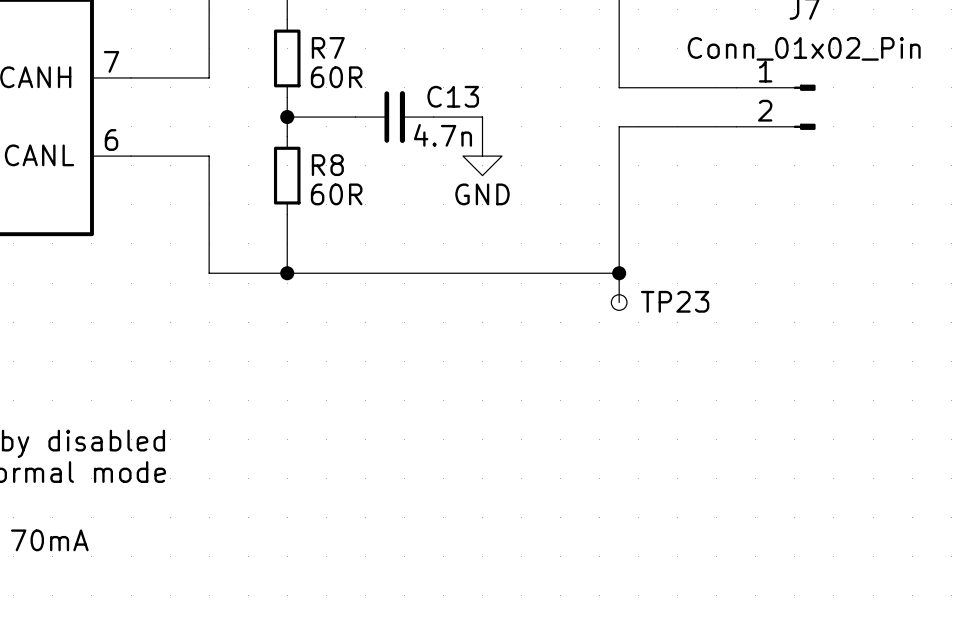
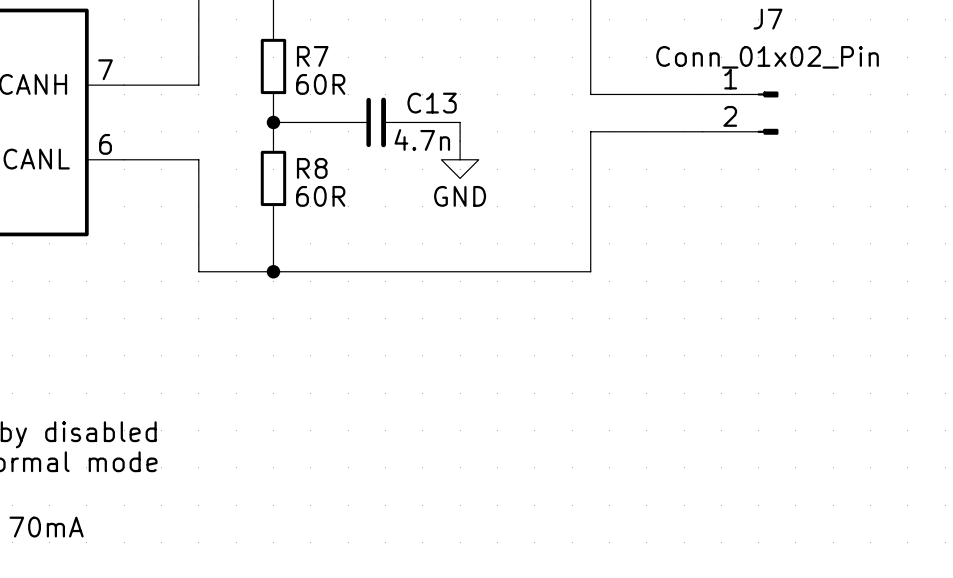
wire: (619, 273) (619, 302) -> none
junction: (619, 273) -> none
TP23: (619, 302) -> none

